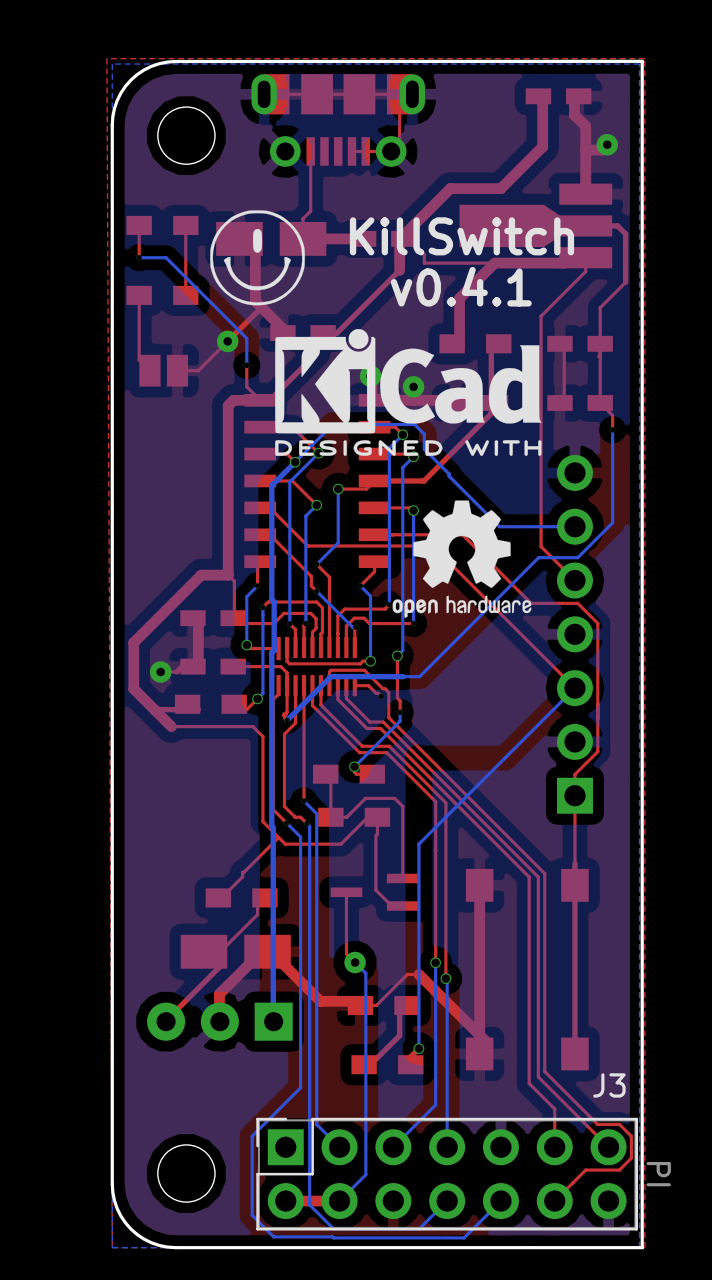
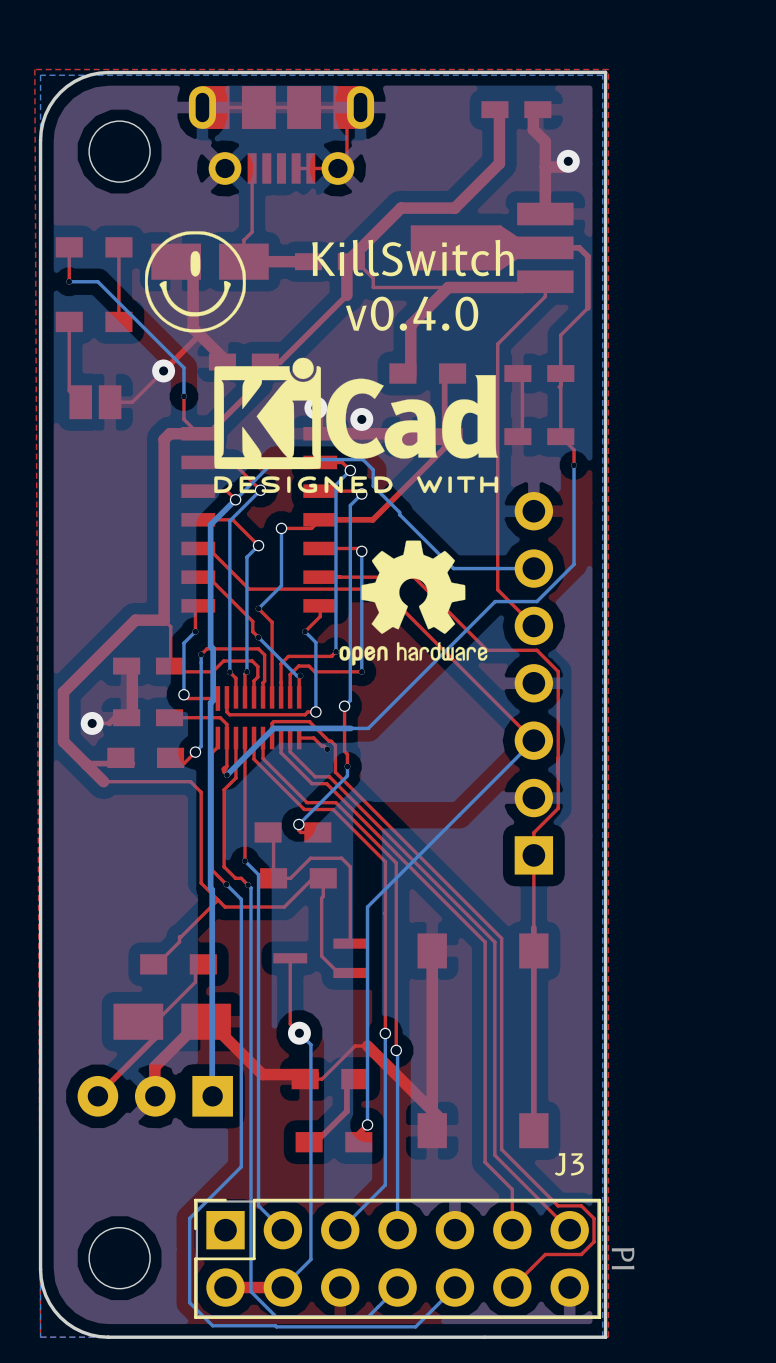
text: v0.4.1 (461, 286) -> v0.4.0 (412, 313)

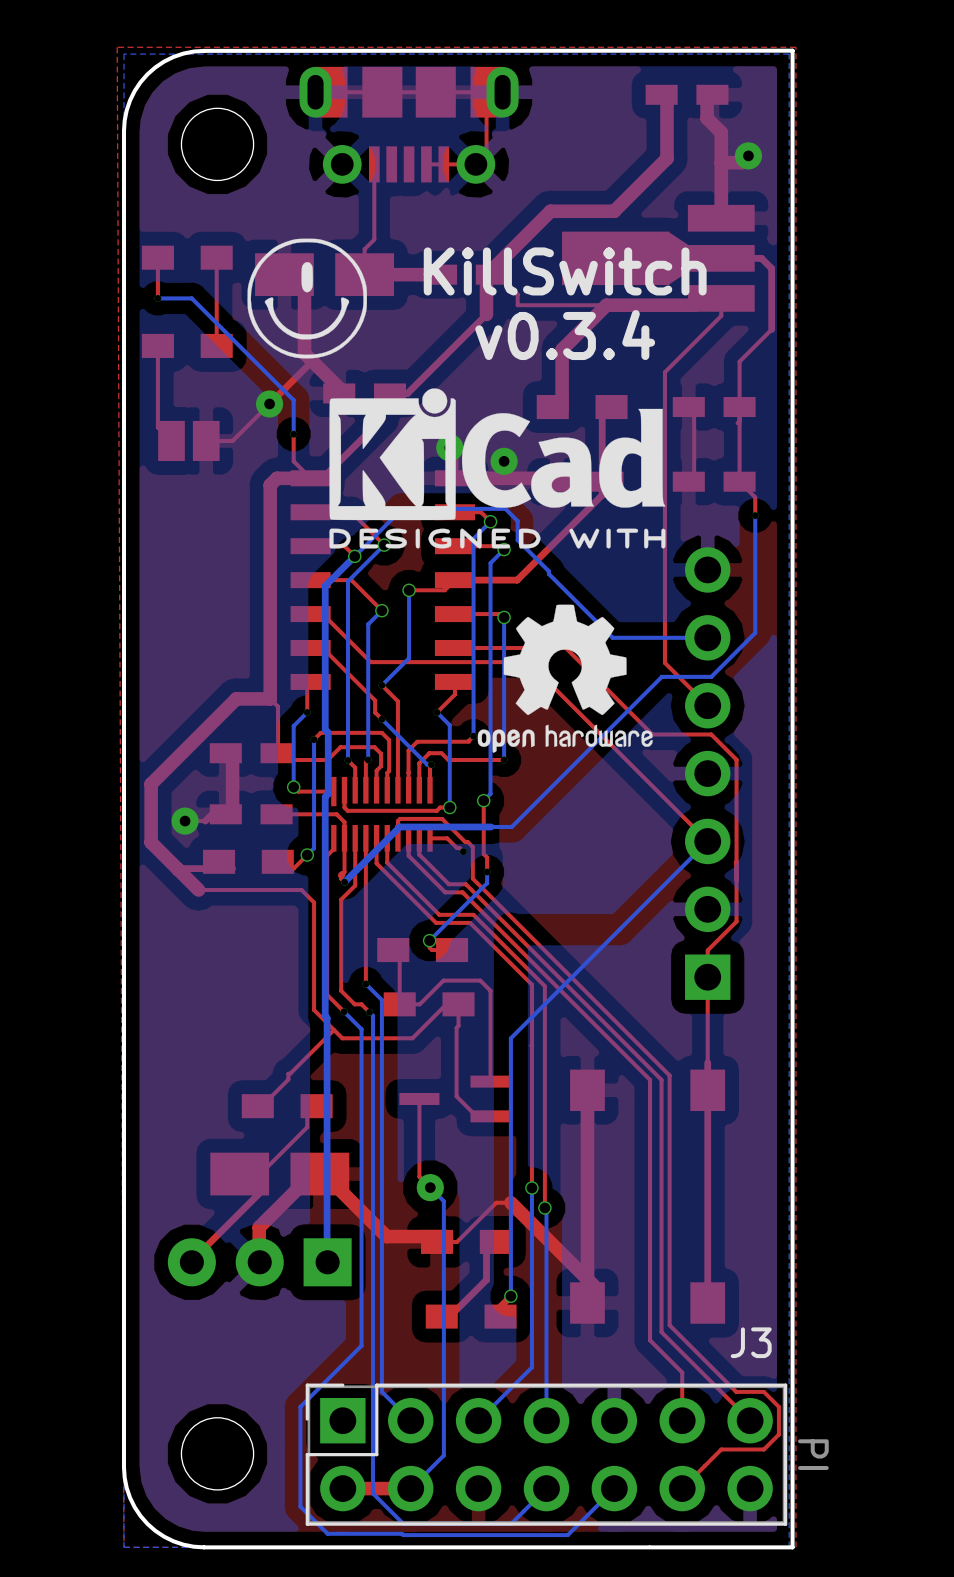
text: v0.4.0 (412, 313) -> v0.3.4 (565, 335)

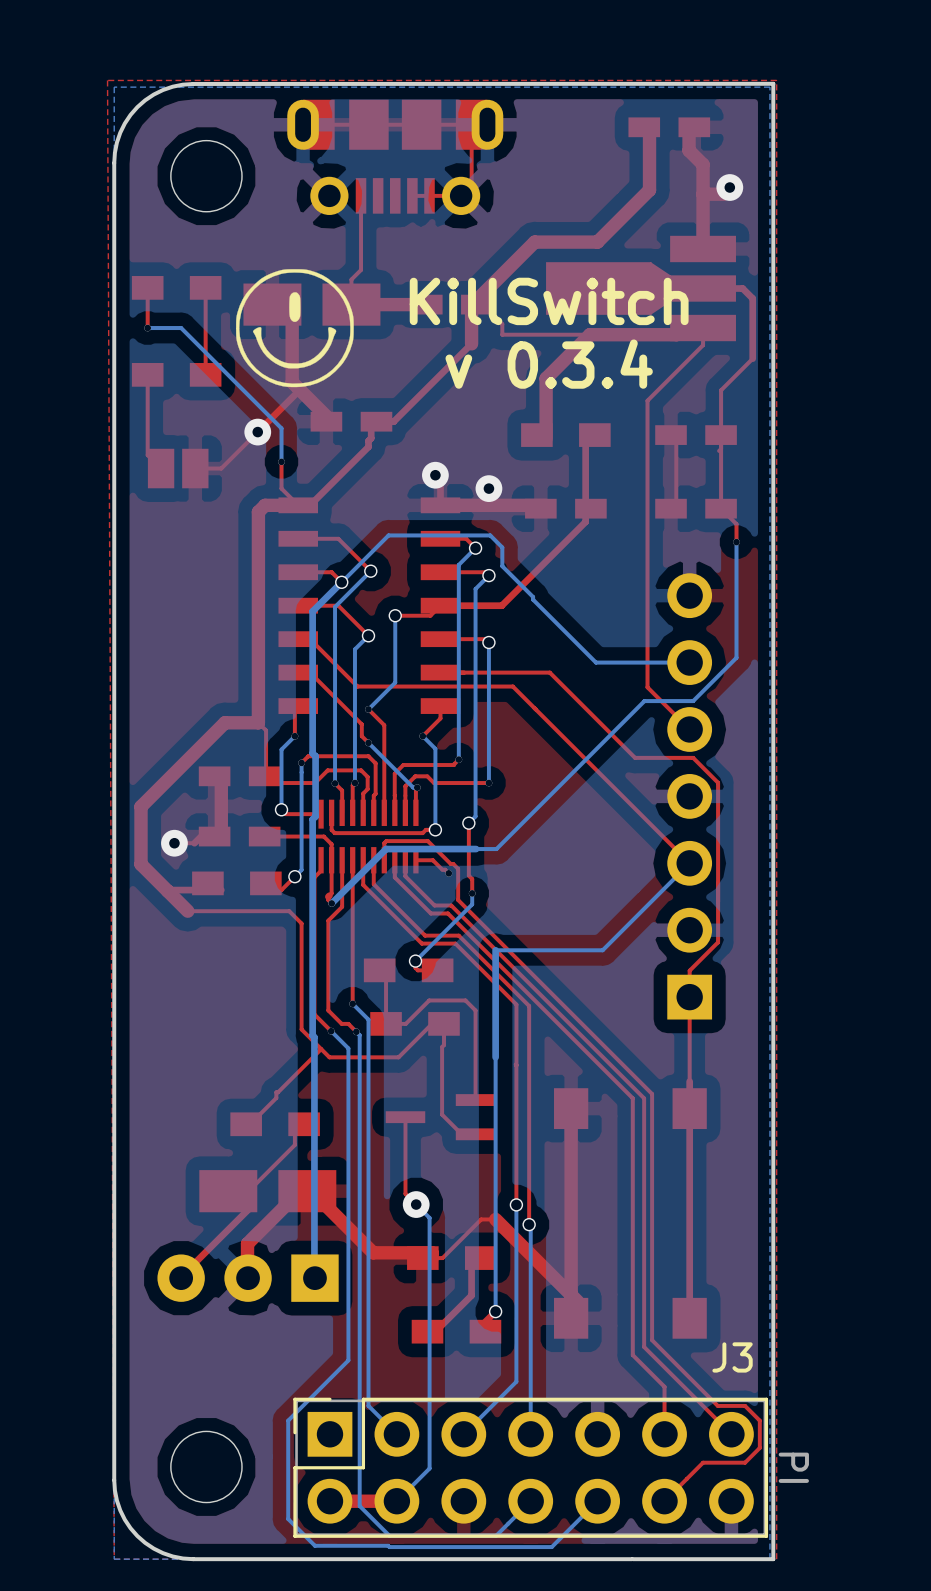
text: v0.3.4 (565, 335) -> v 0.3.4 (549, 364)
drawing: [329, 388, 666, 549] -> none
drawing: [477, 604, 653, 753] -> none
bottom track: (619, 929) (510, 1038) -> (602, 950) (495, 950) (495, 1057)

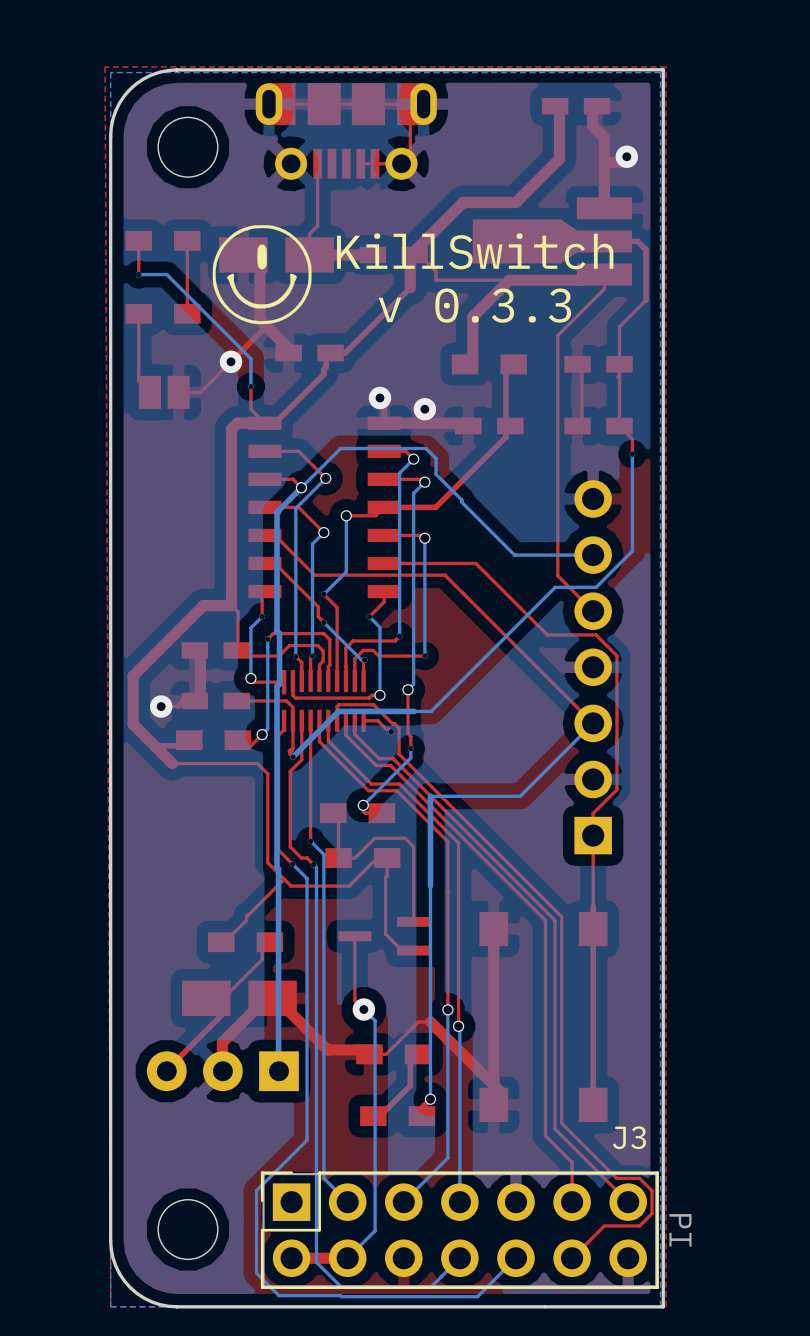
text: v 0.3.4 (549, 364) -> v 0.3.3 (474, 305)

